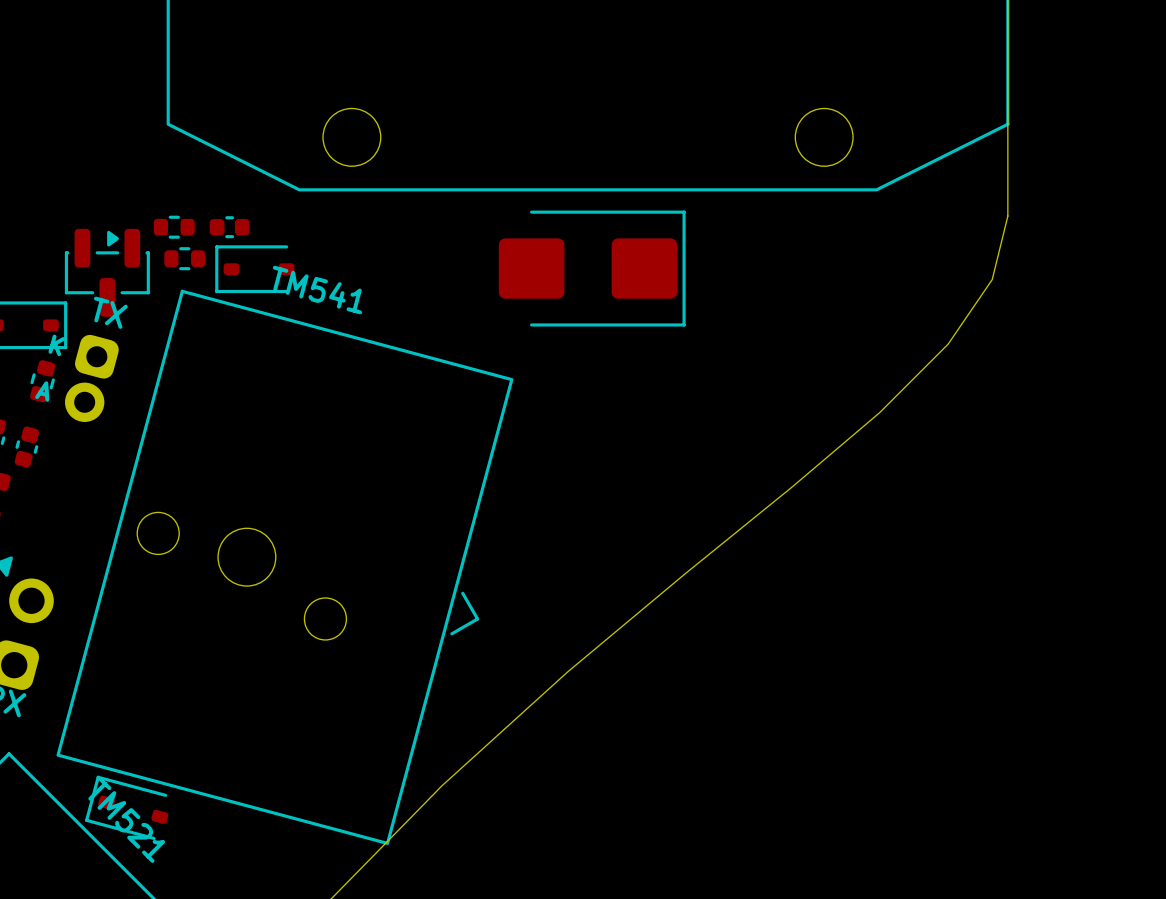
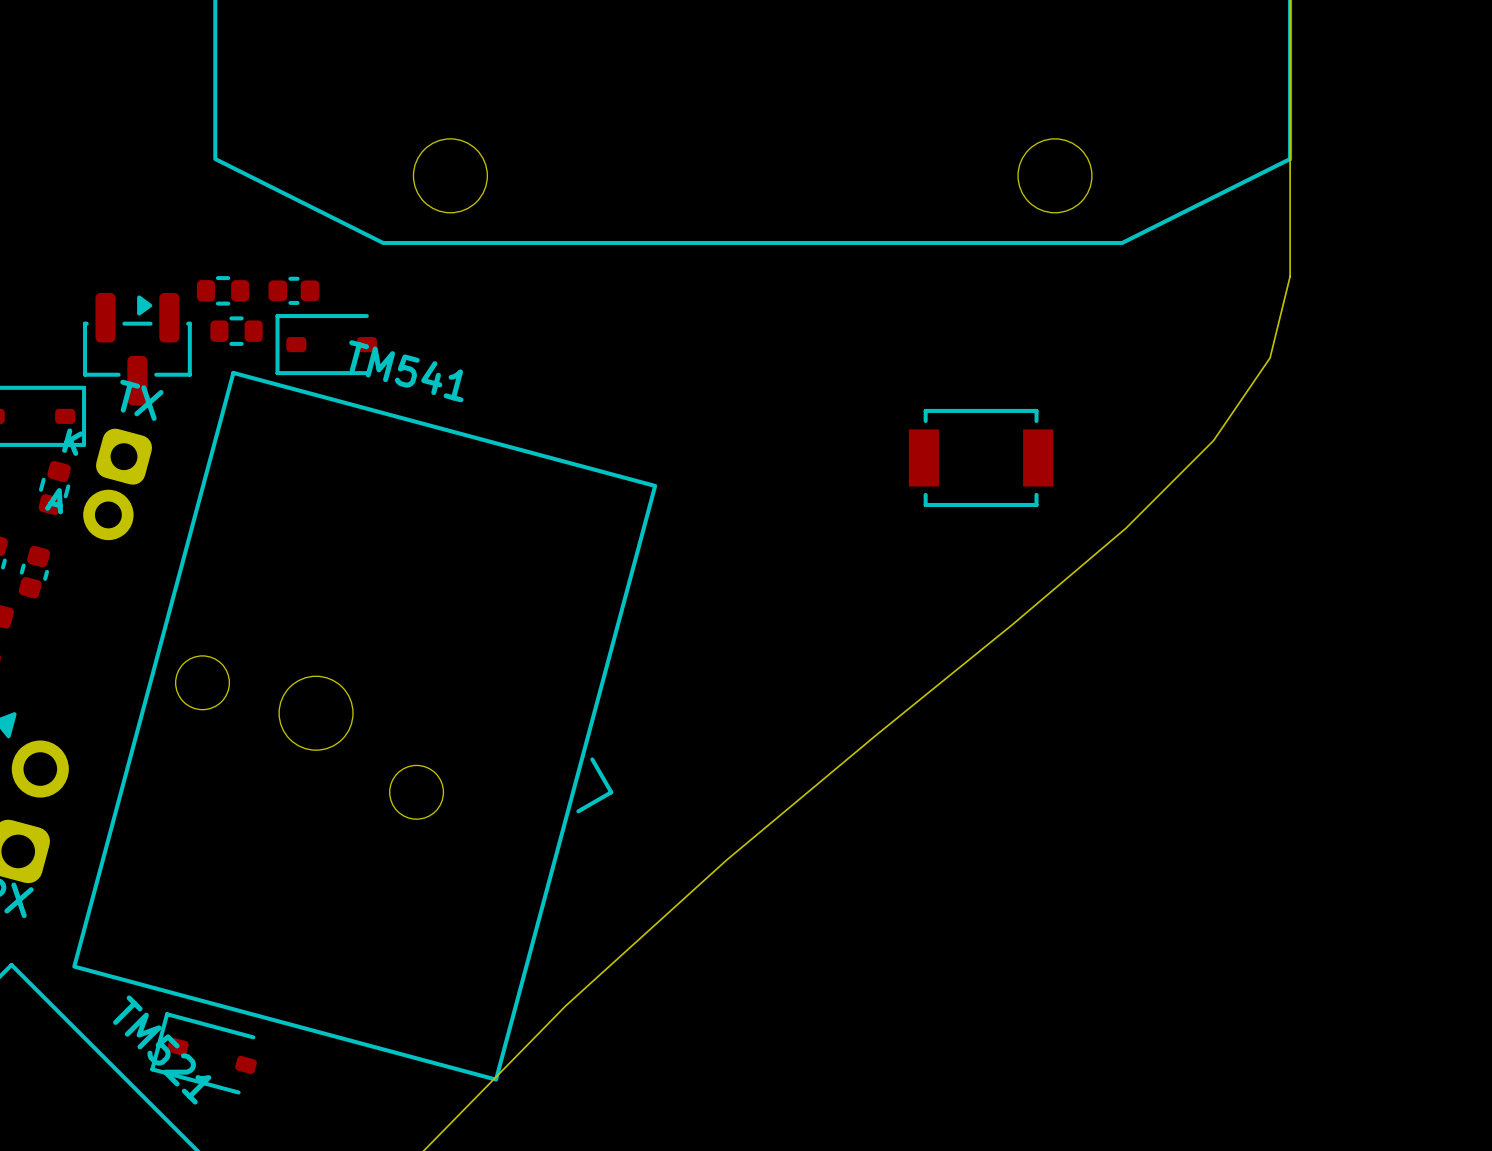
part: (592, 268) -> none
part: none -> (981, 457)
part position: (126, 807) -> (203, 1053)

